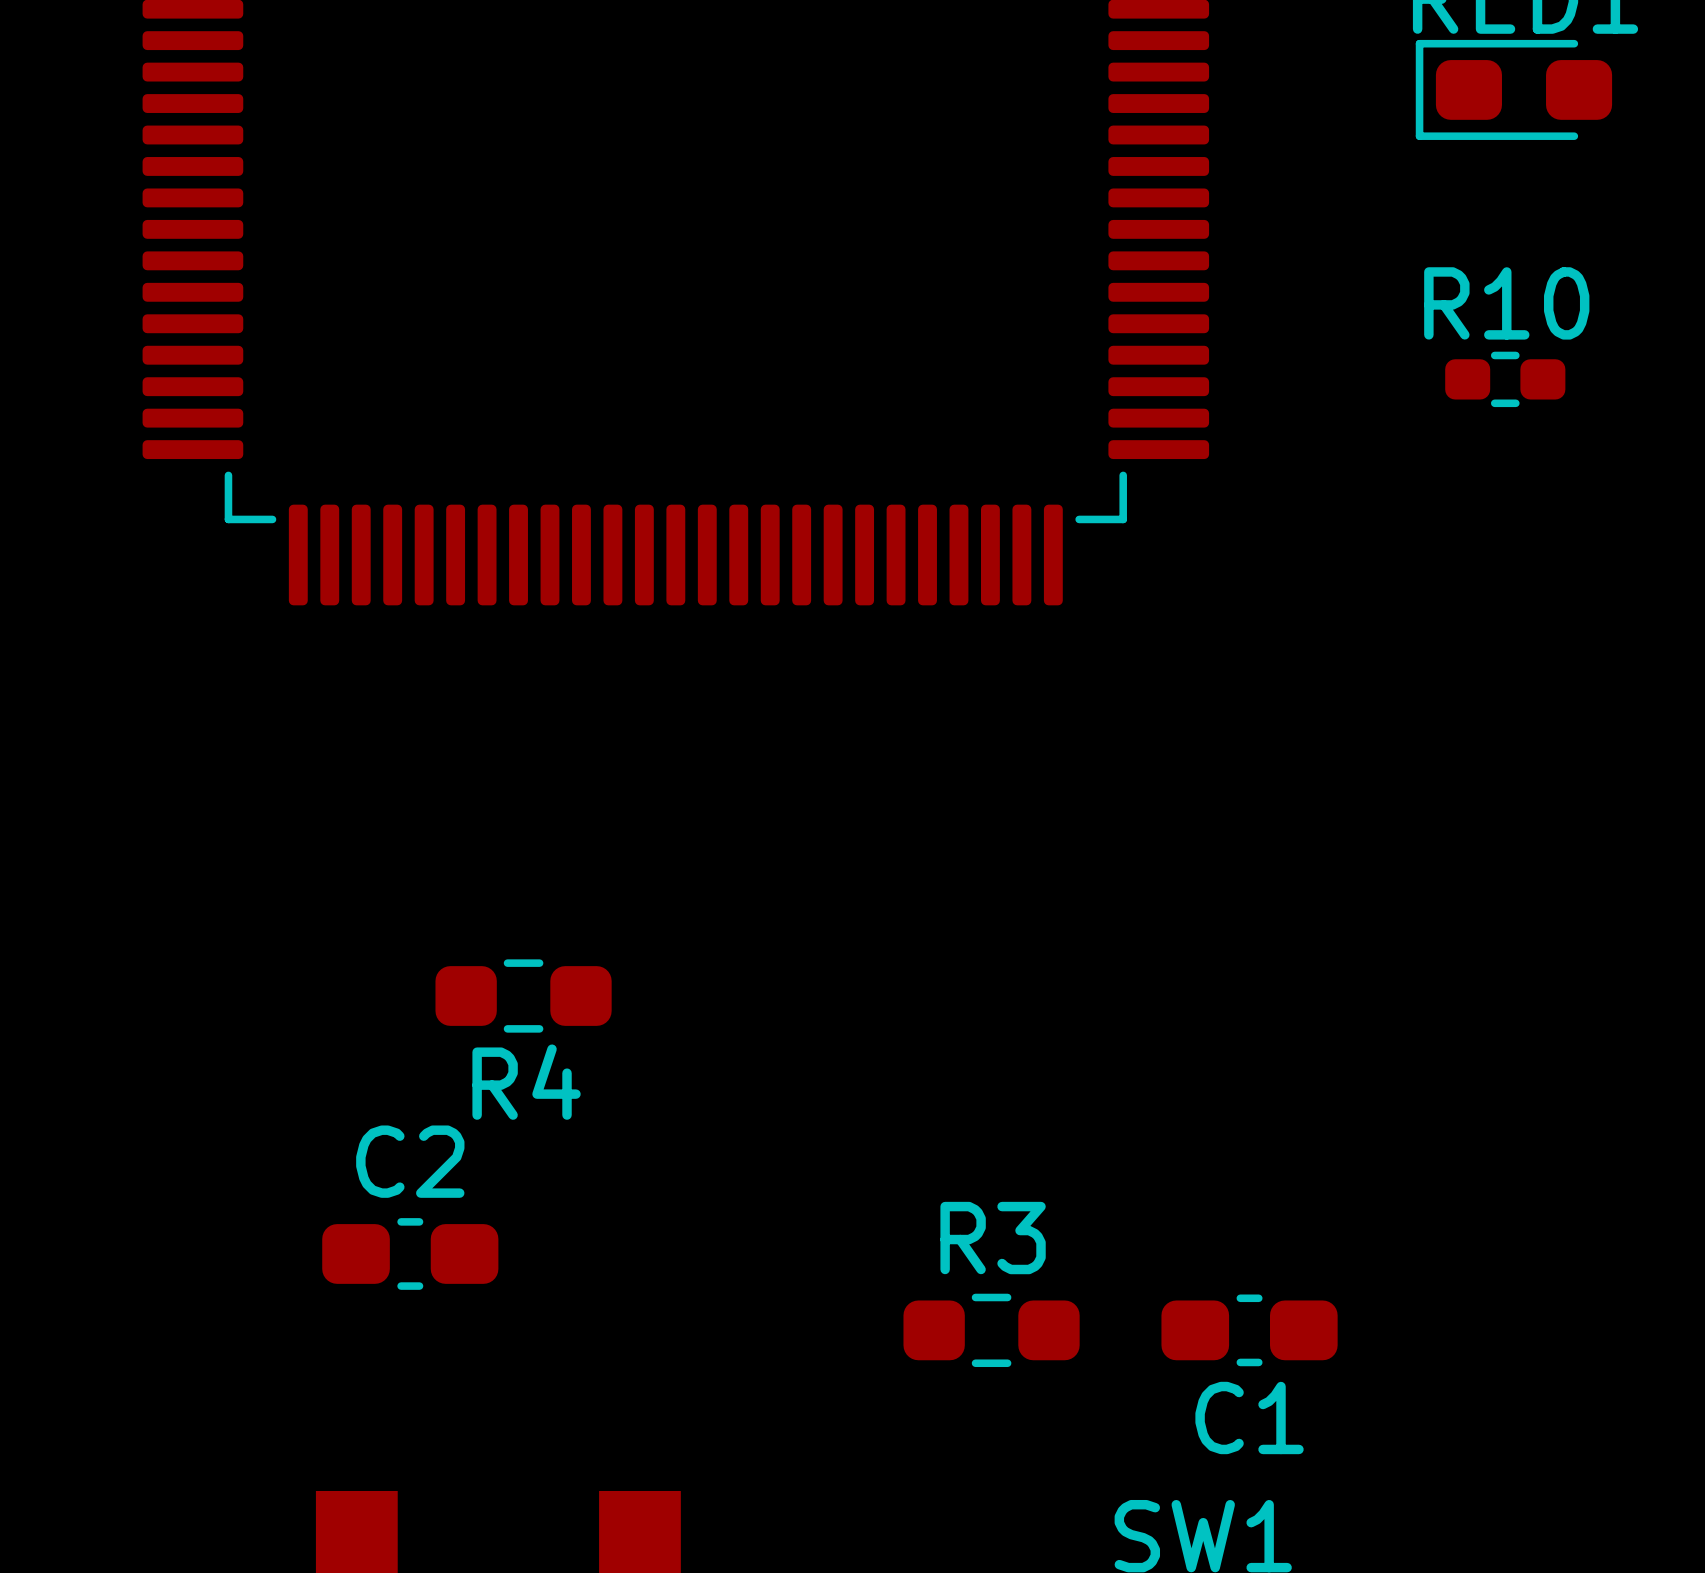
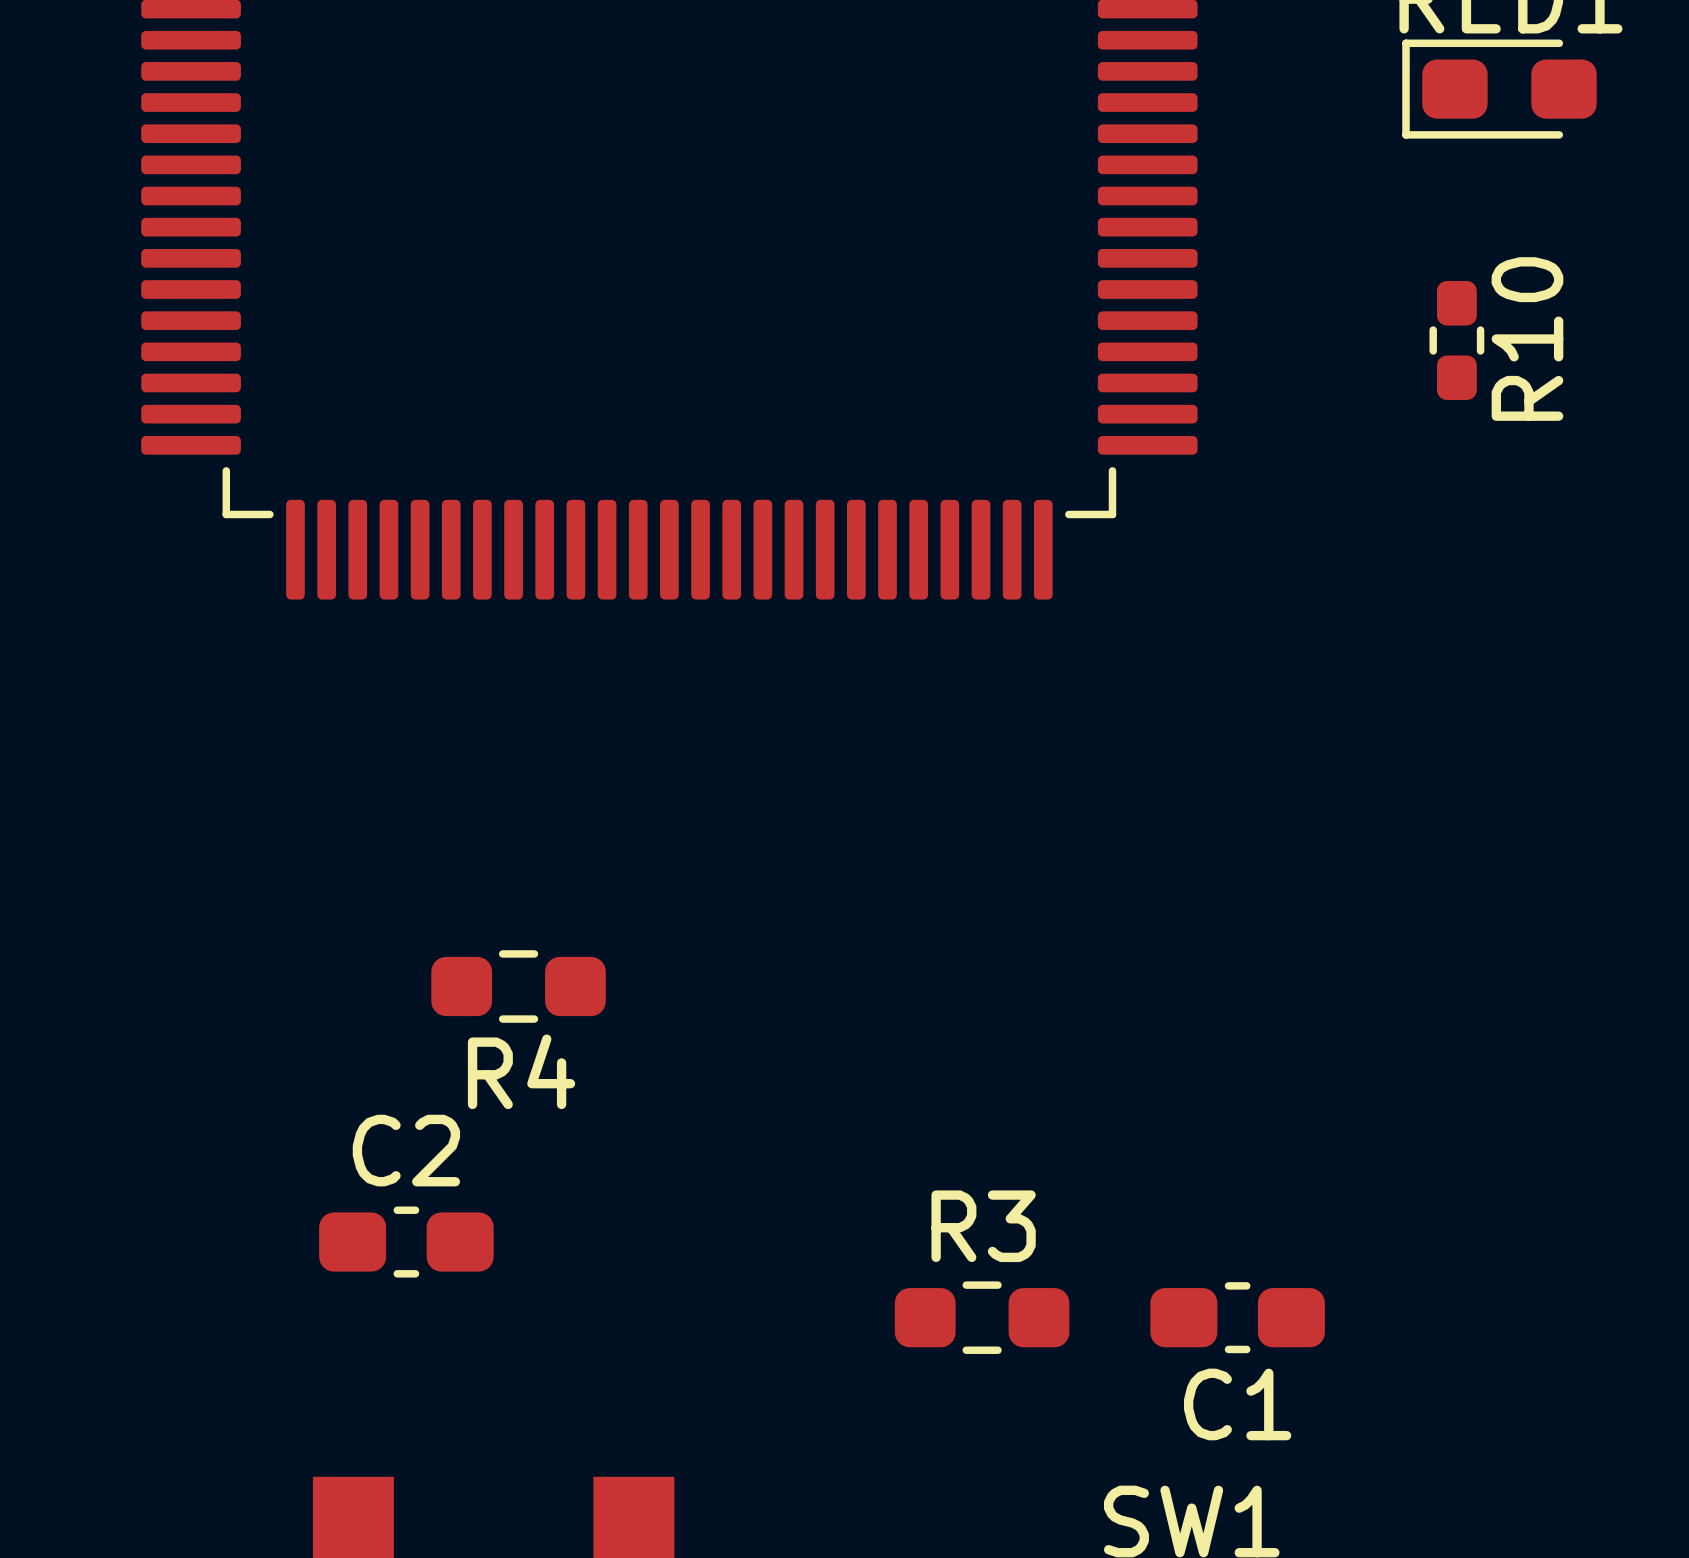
R10 rotation: 0° (1505, 379) -> 90° clockwise (1456, 340)

